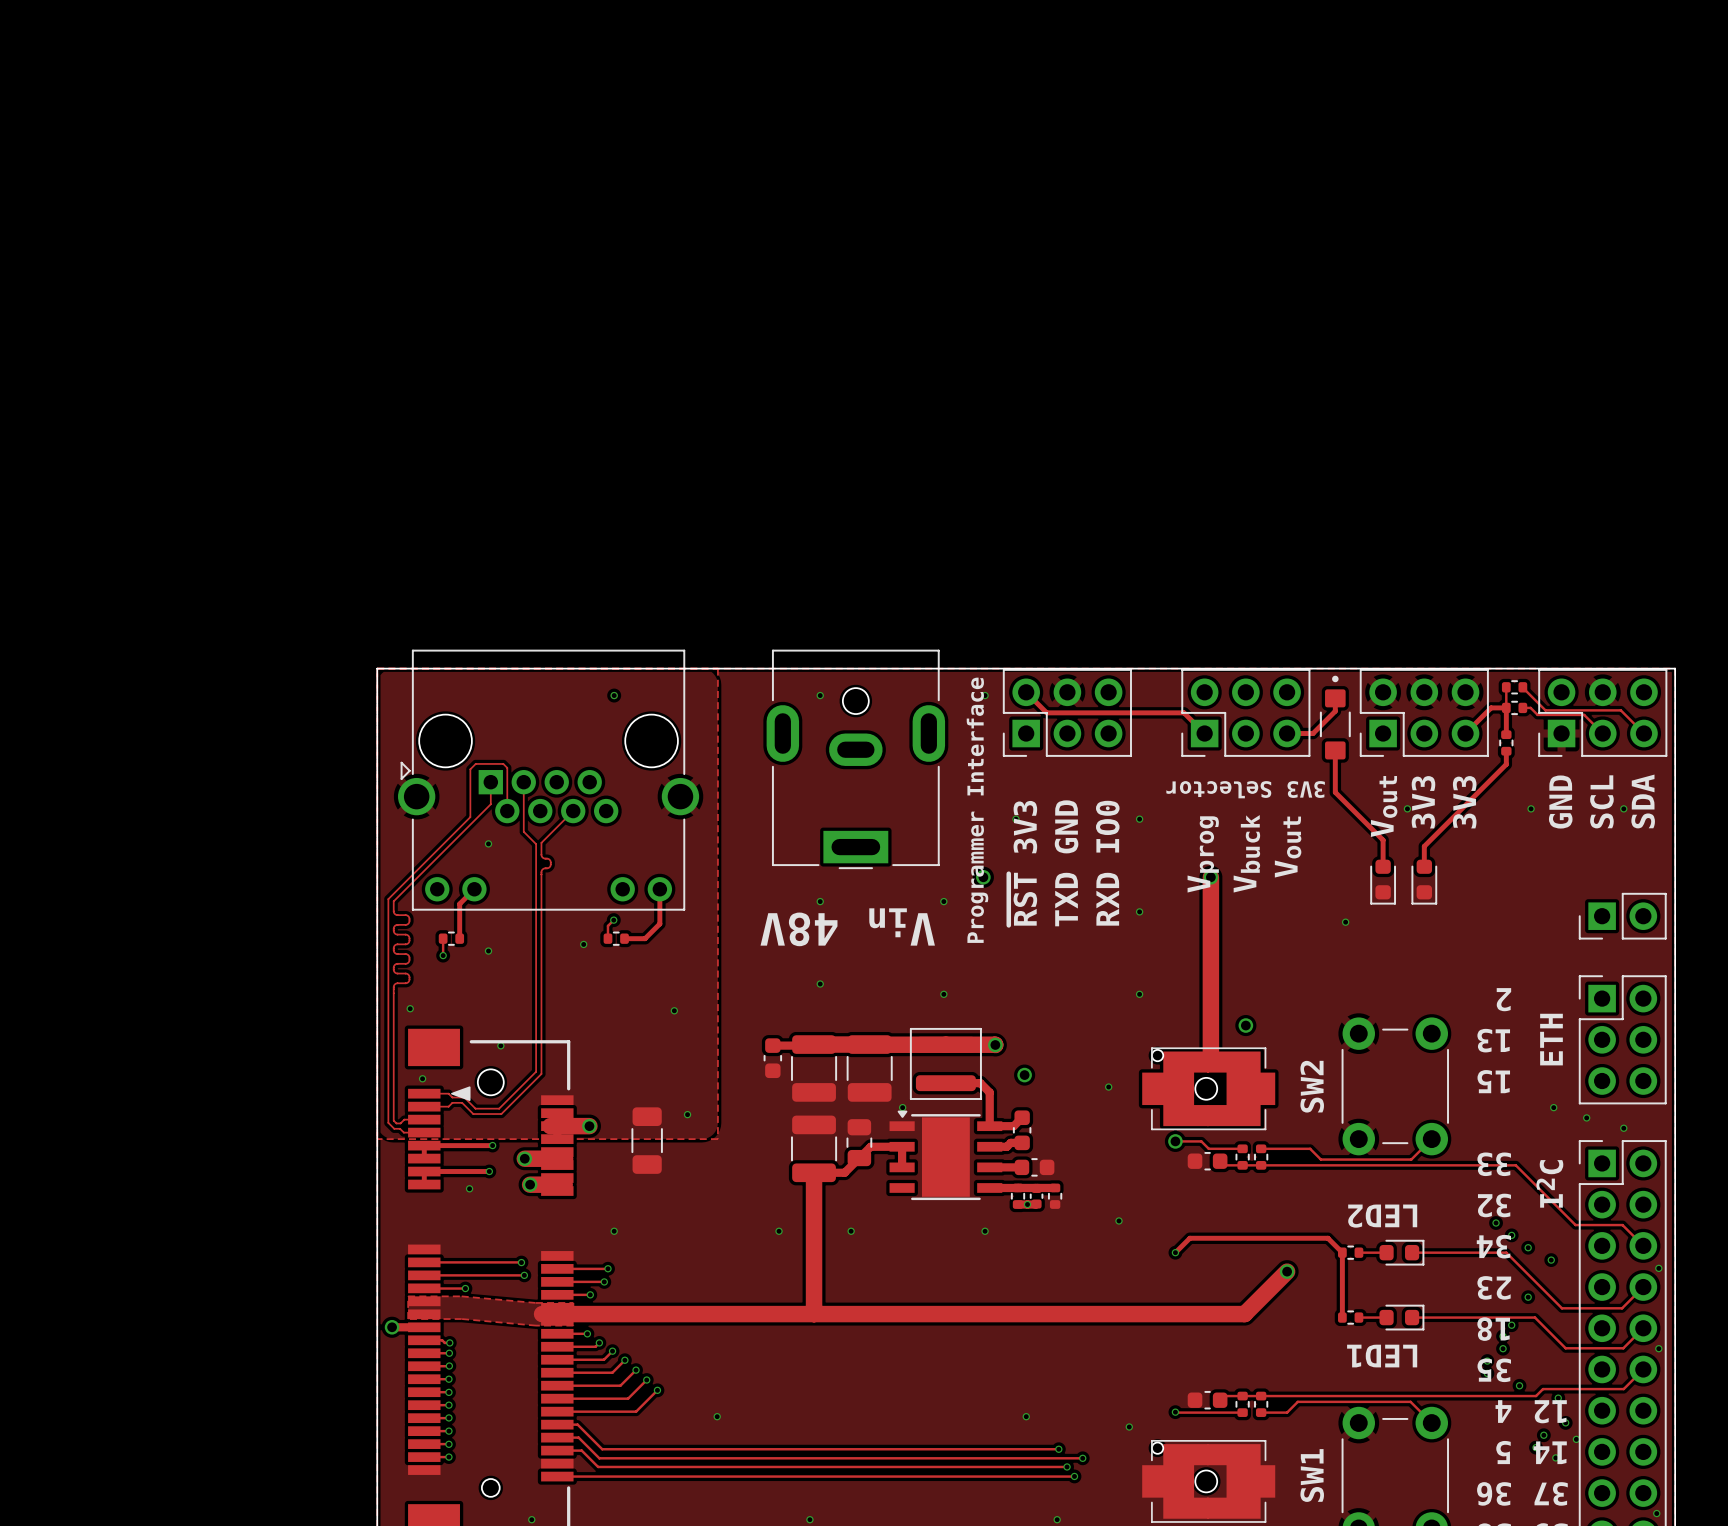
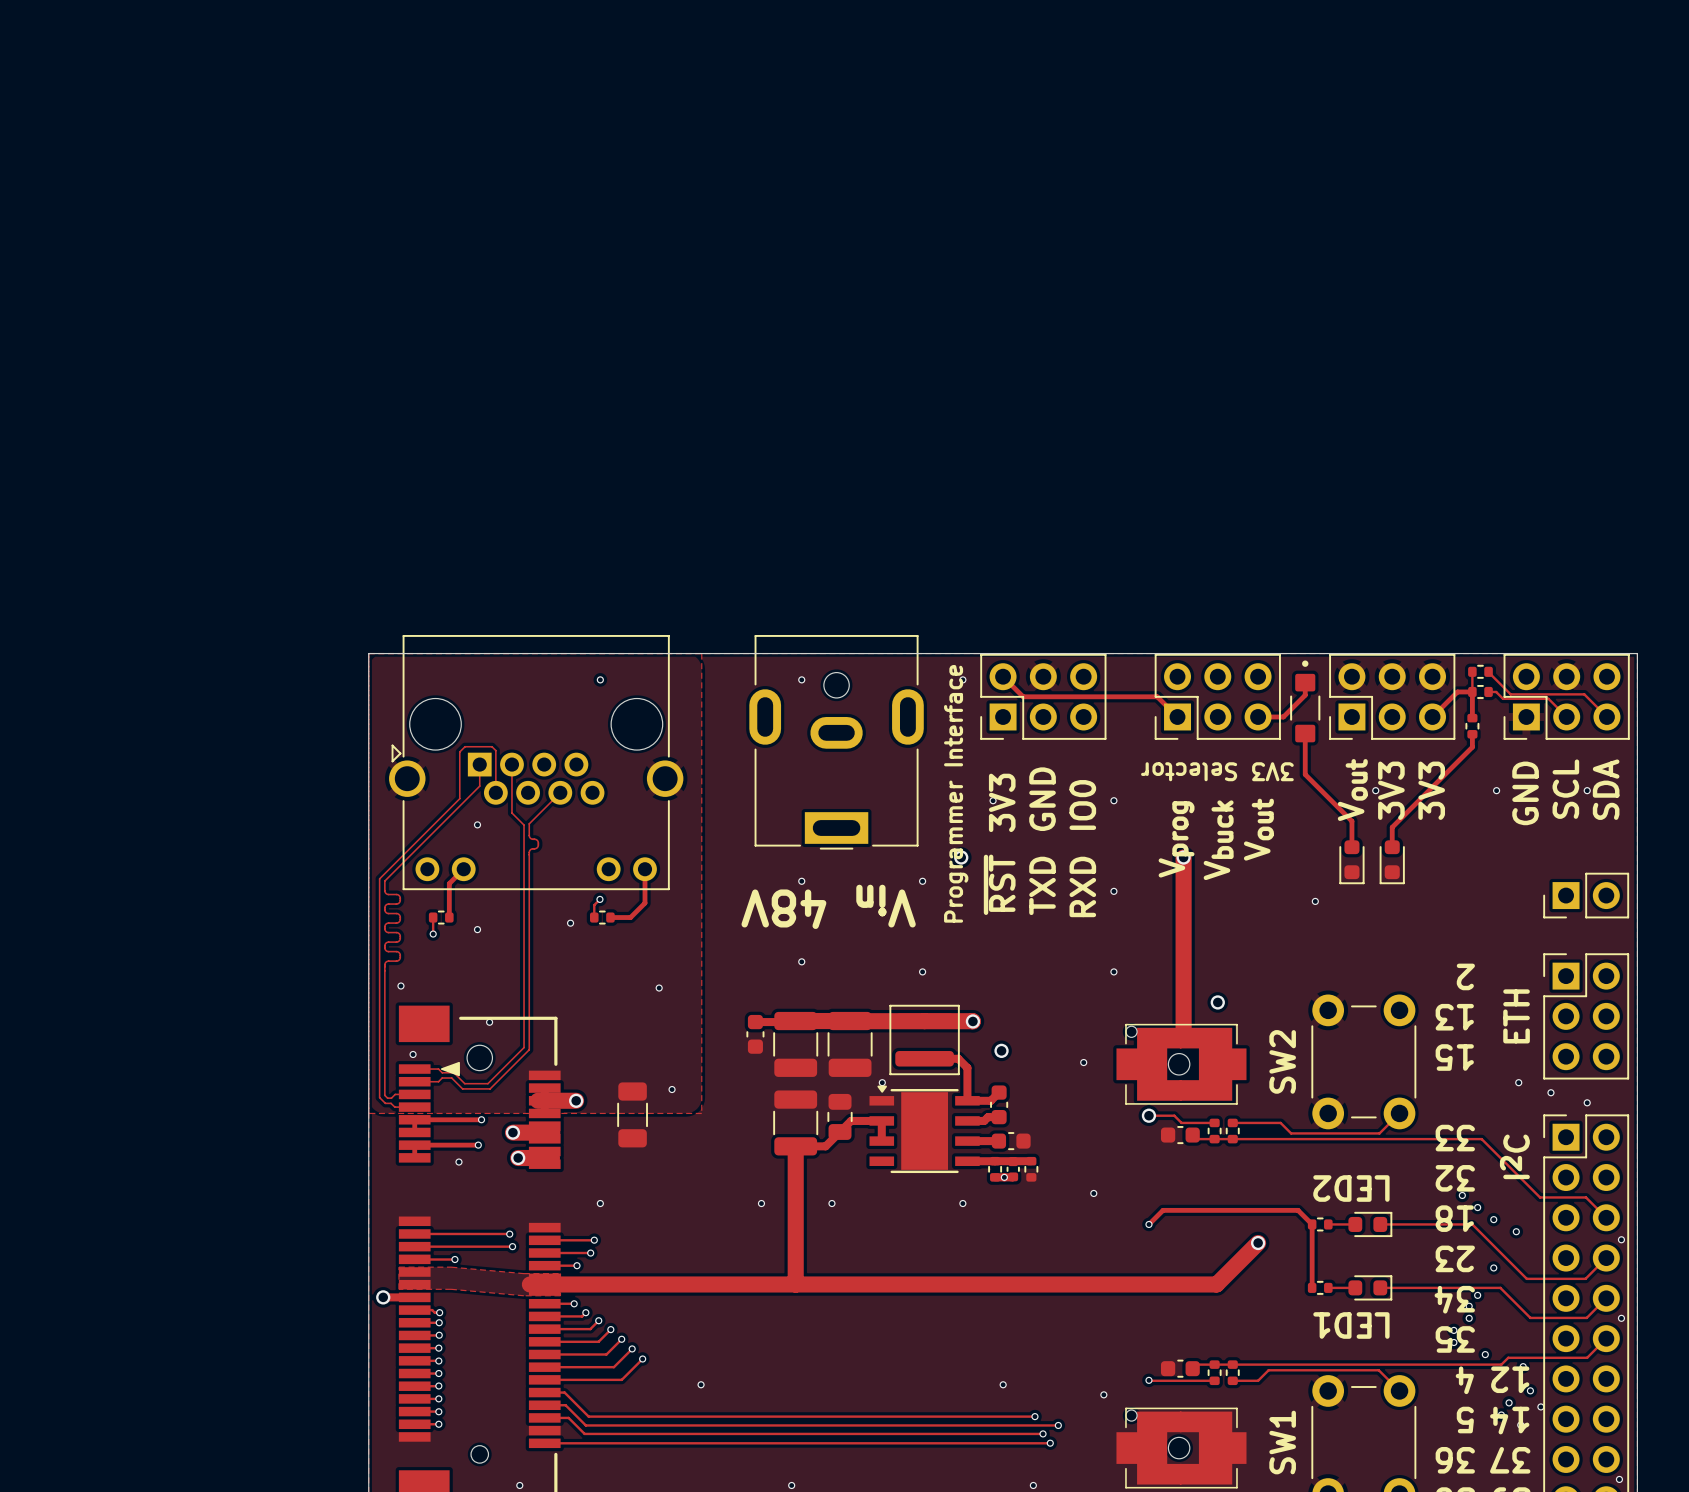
text: 34 (1493, 1246) -> 18 (1454, 1218)
text: 18 (1493, 1329) -> 34 (1454, 1299)

